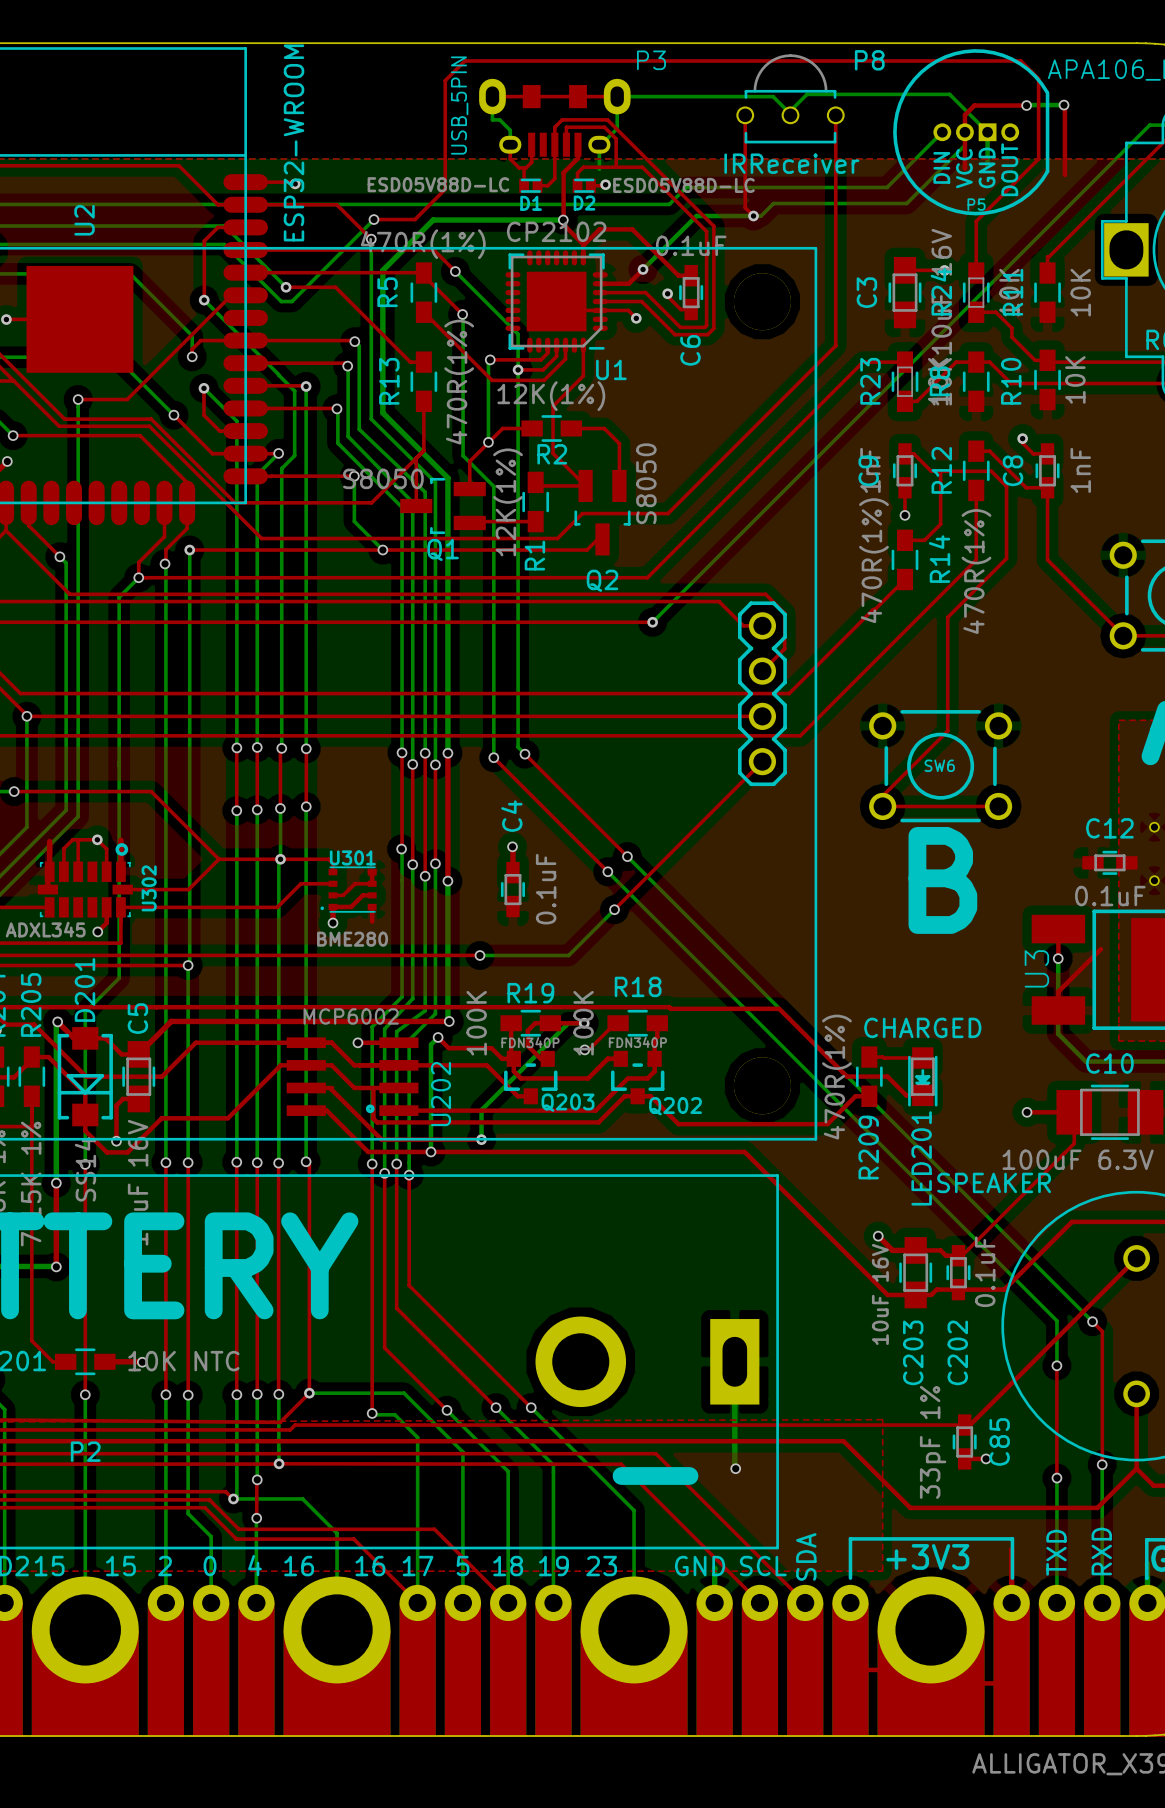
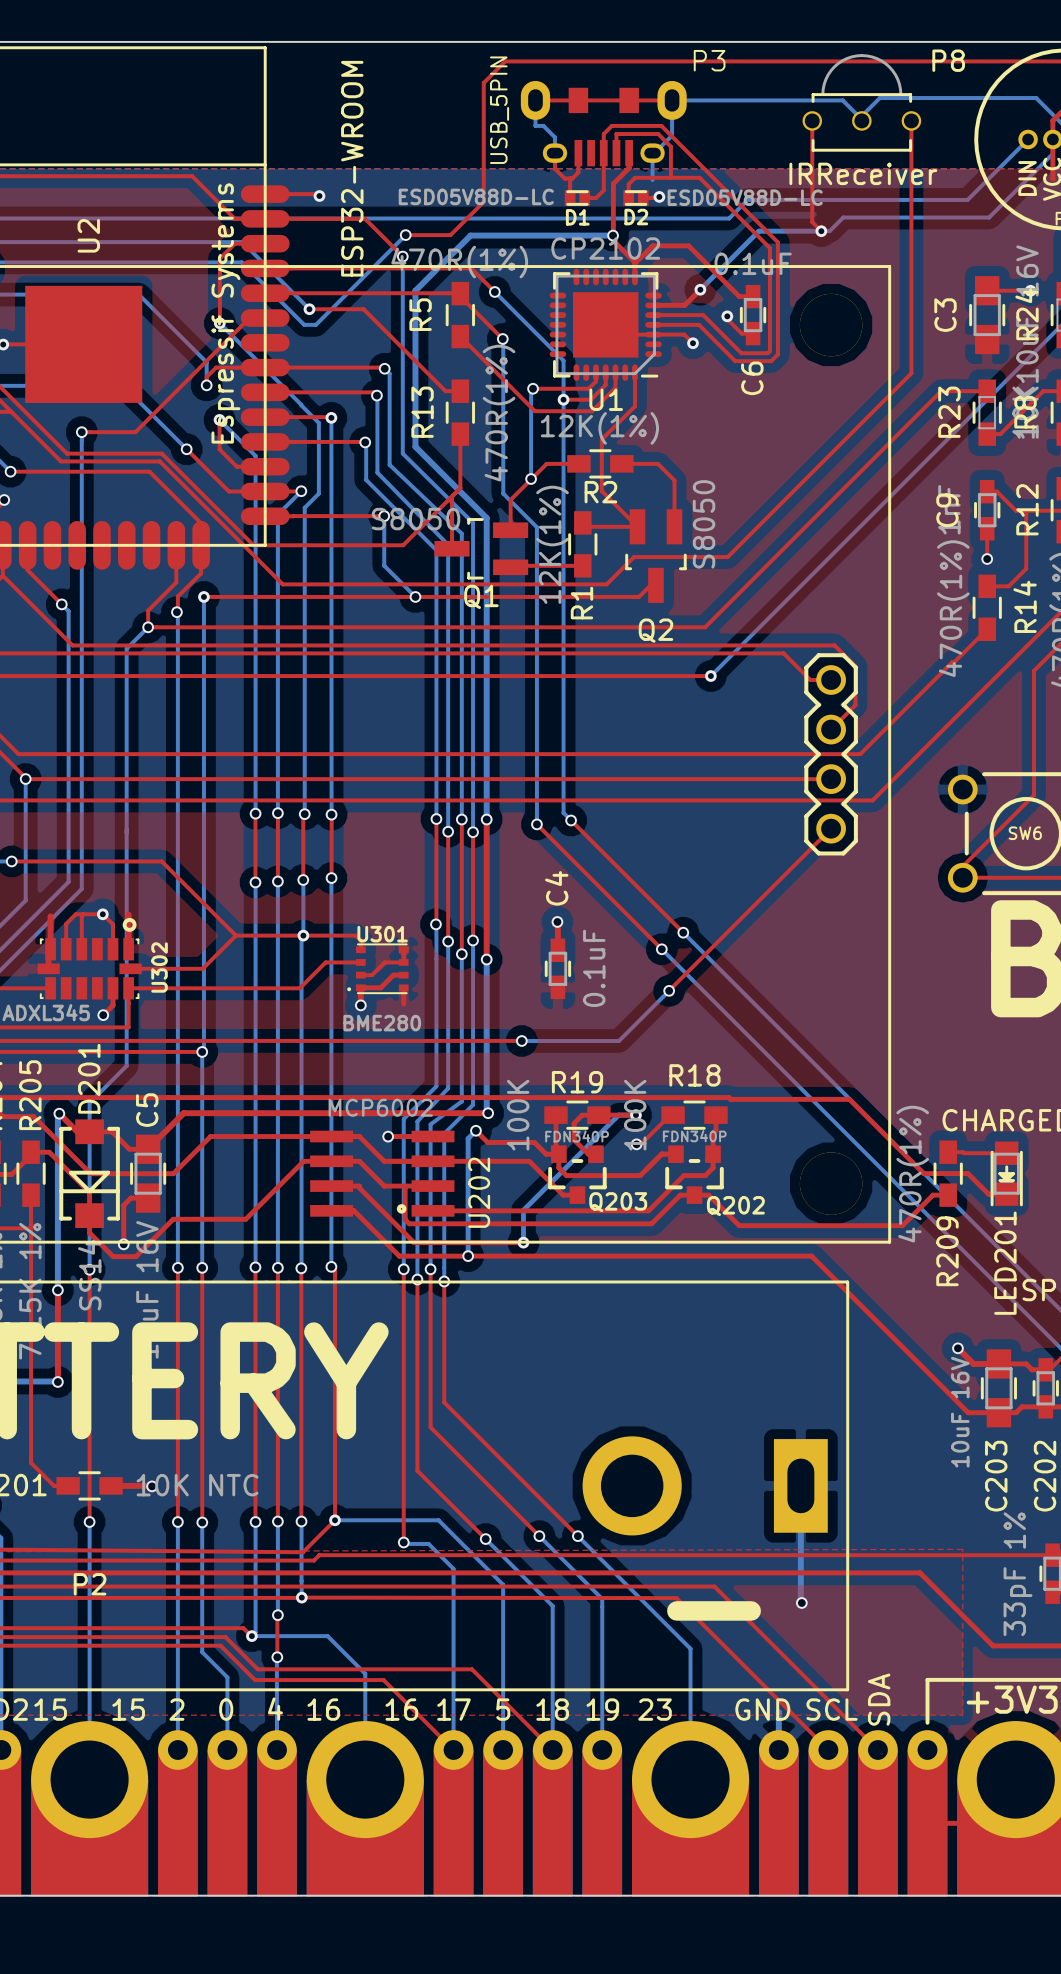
U2 text position: ESP32-WROOM (294, 142) -> ESP32-WROOM (352, 168)
U2 text: none -> Espressif Systems (225, 313)
U1 name position: U1 (611, 369) -> U1 (606, 399)

